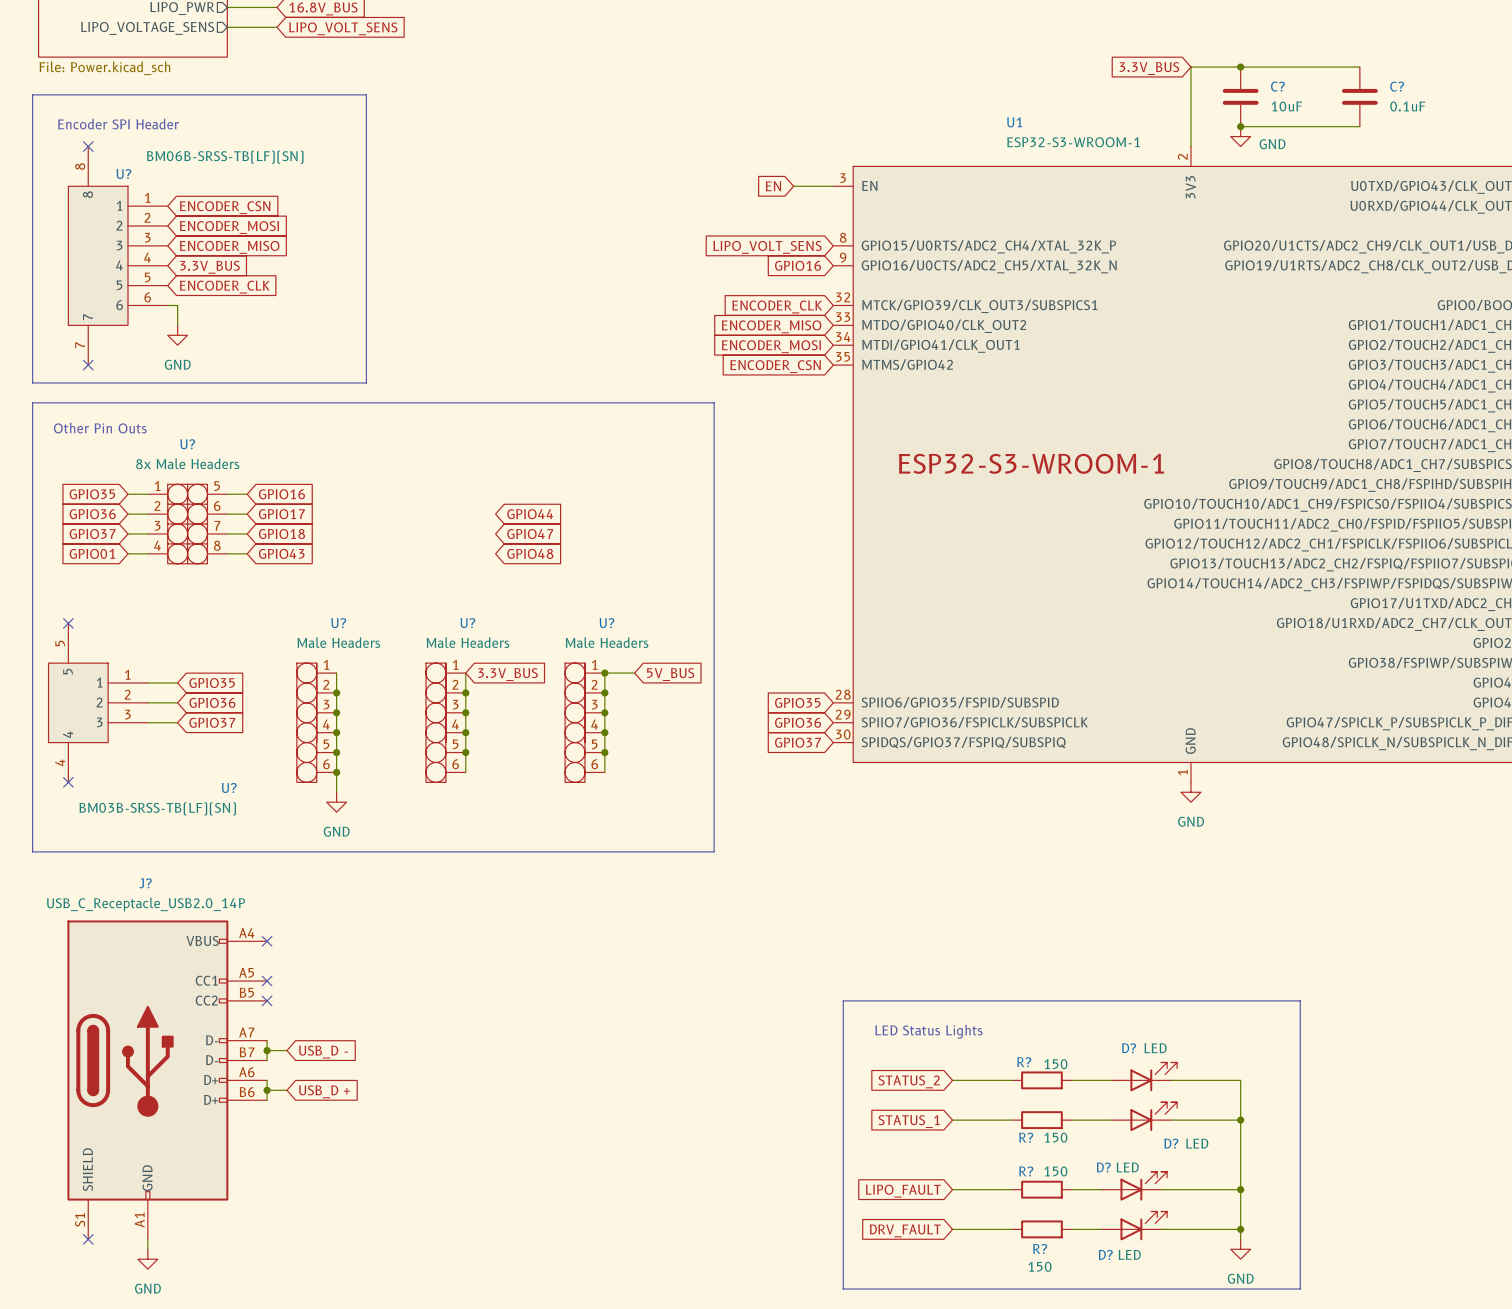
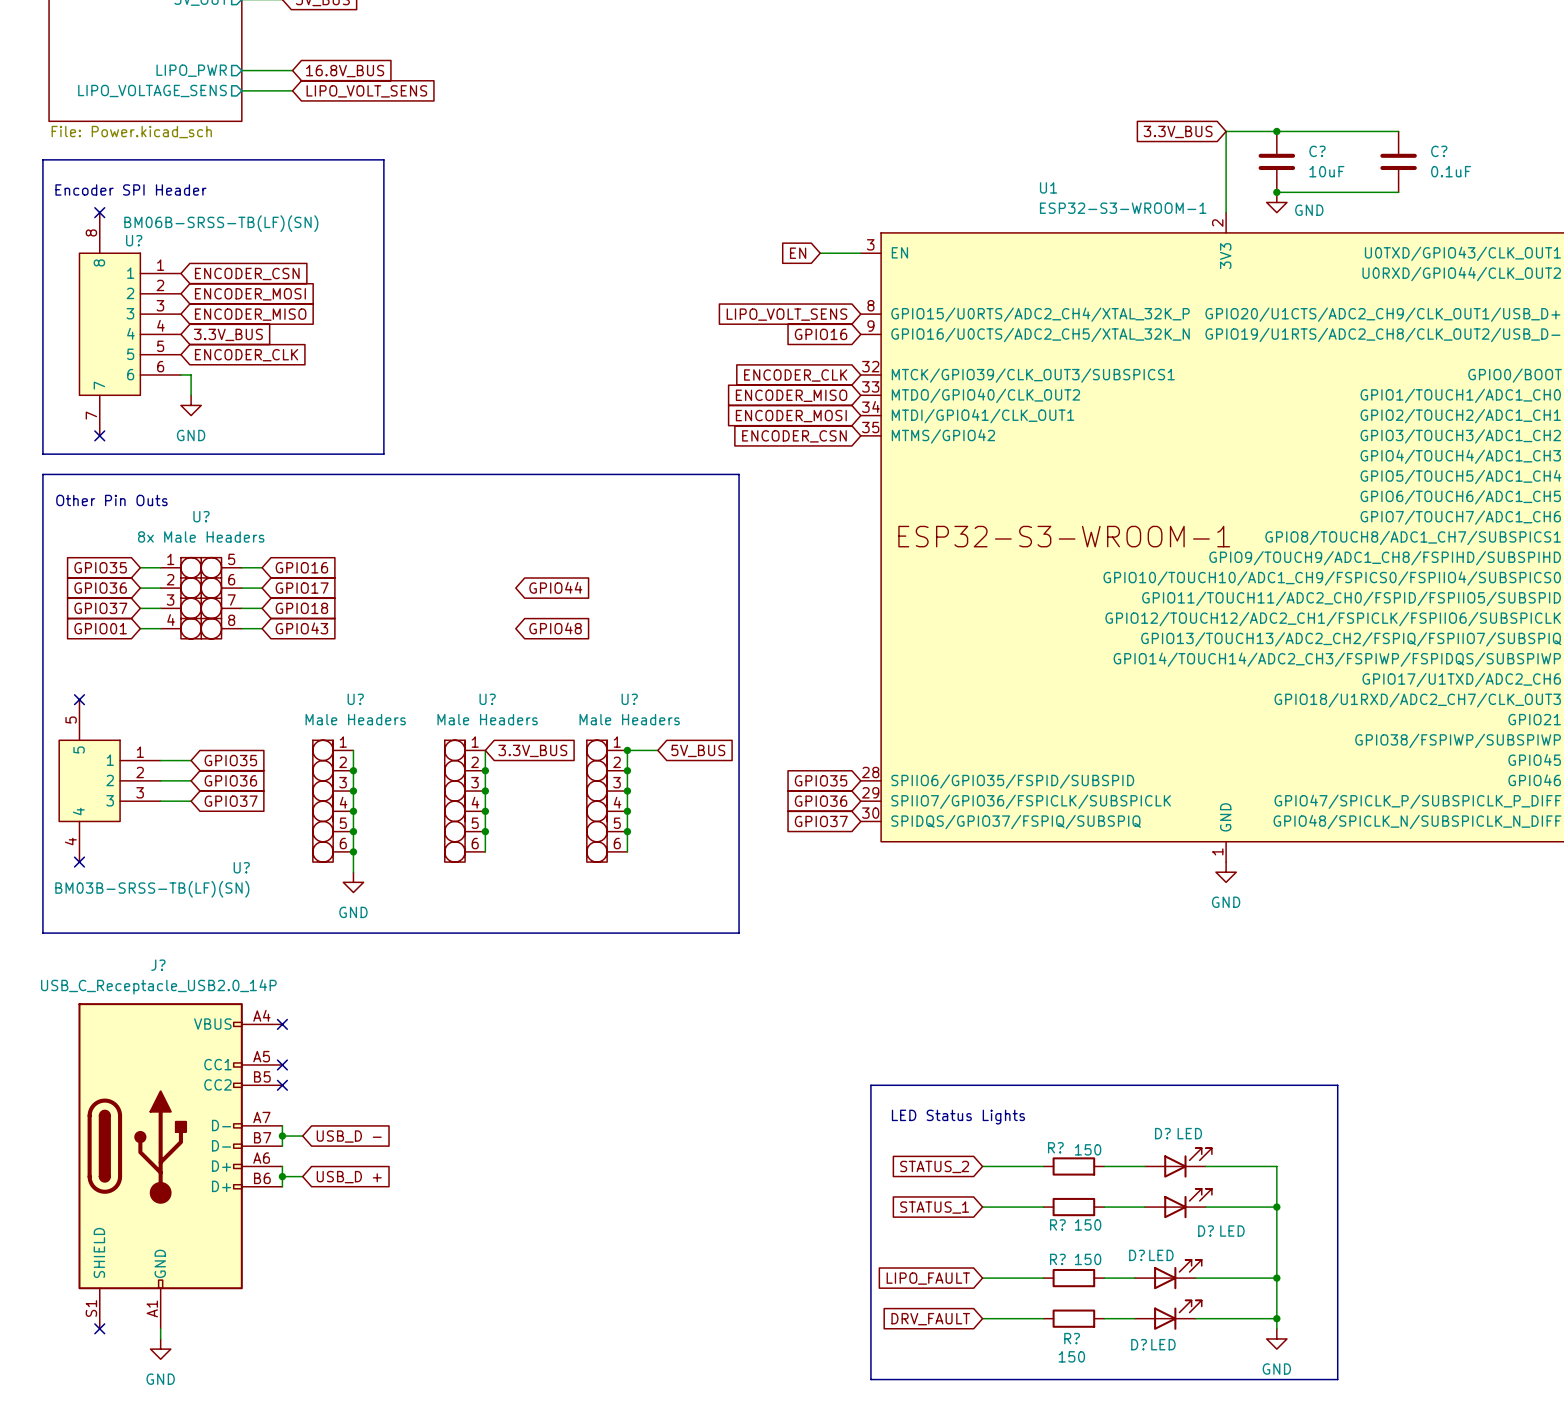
global label: GPIO47 (530, 534) -> none

